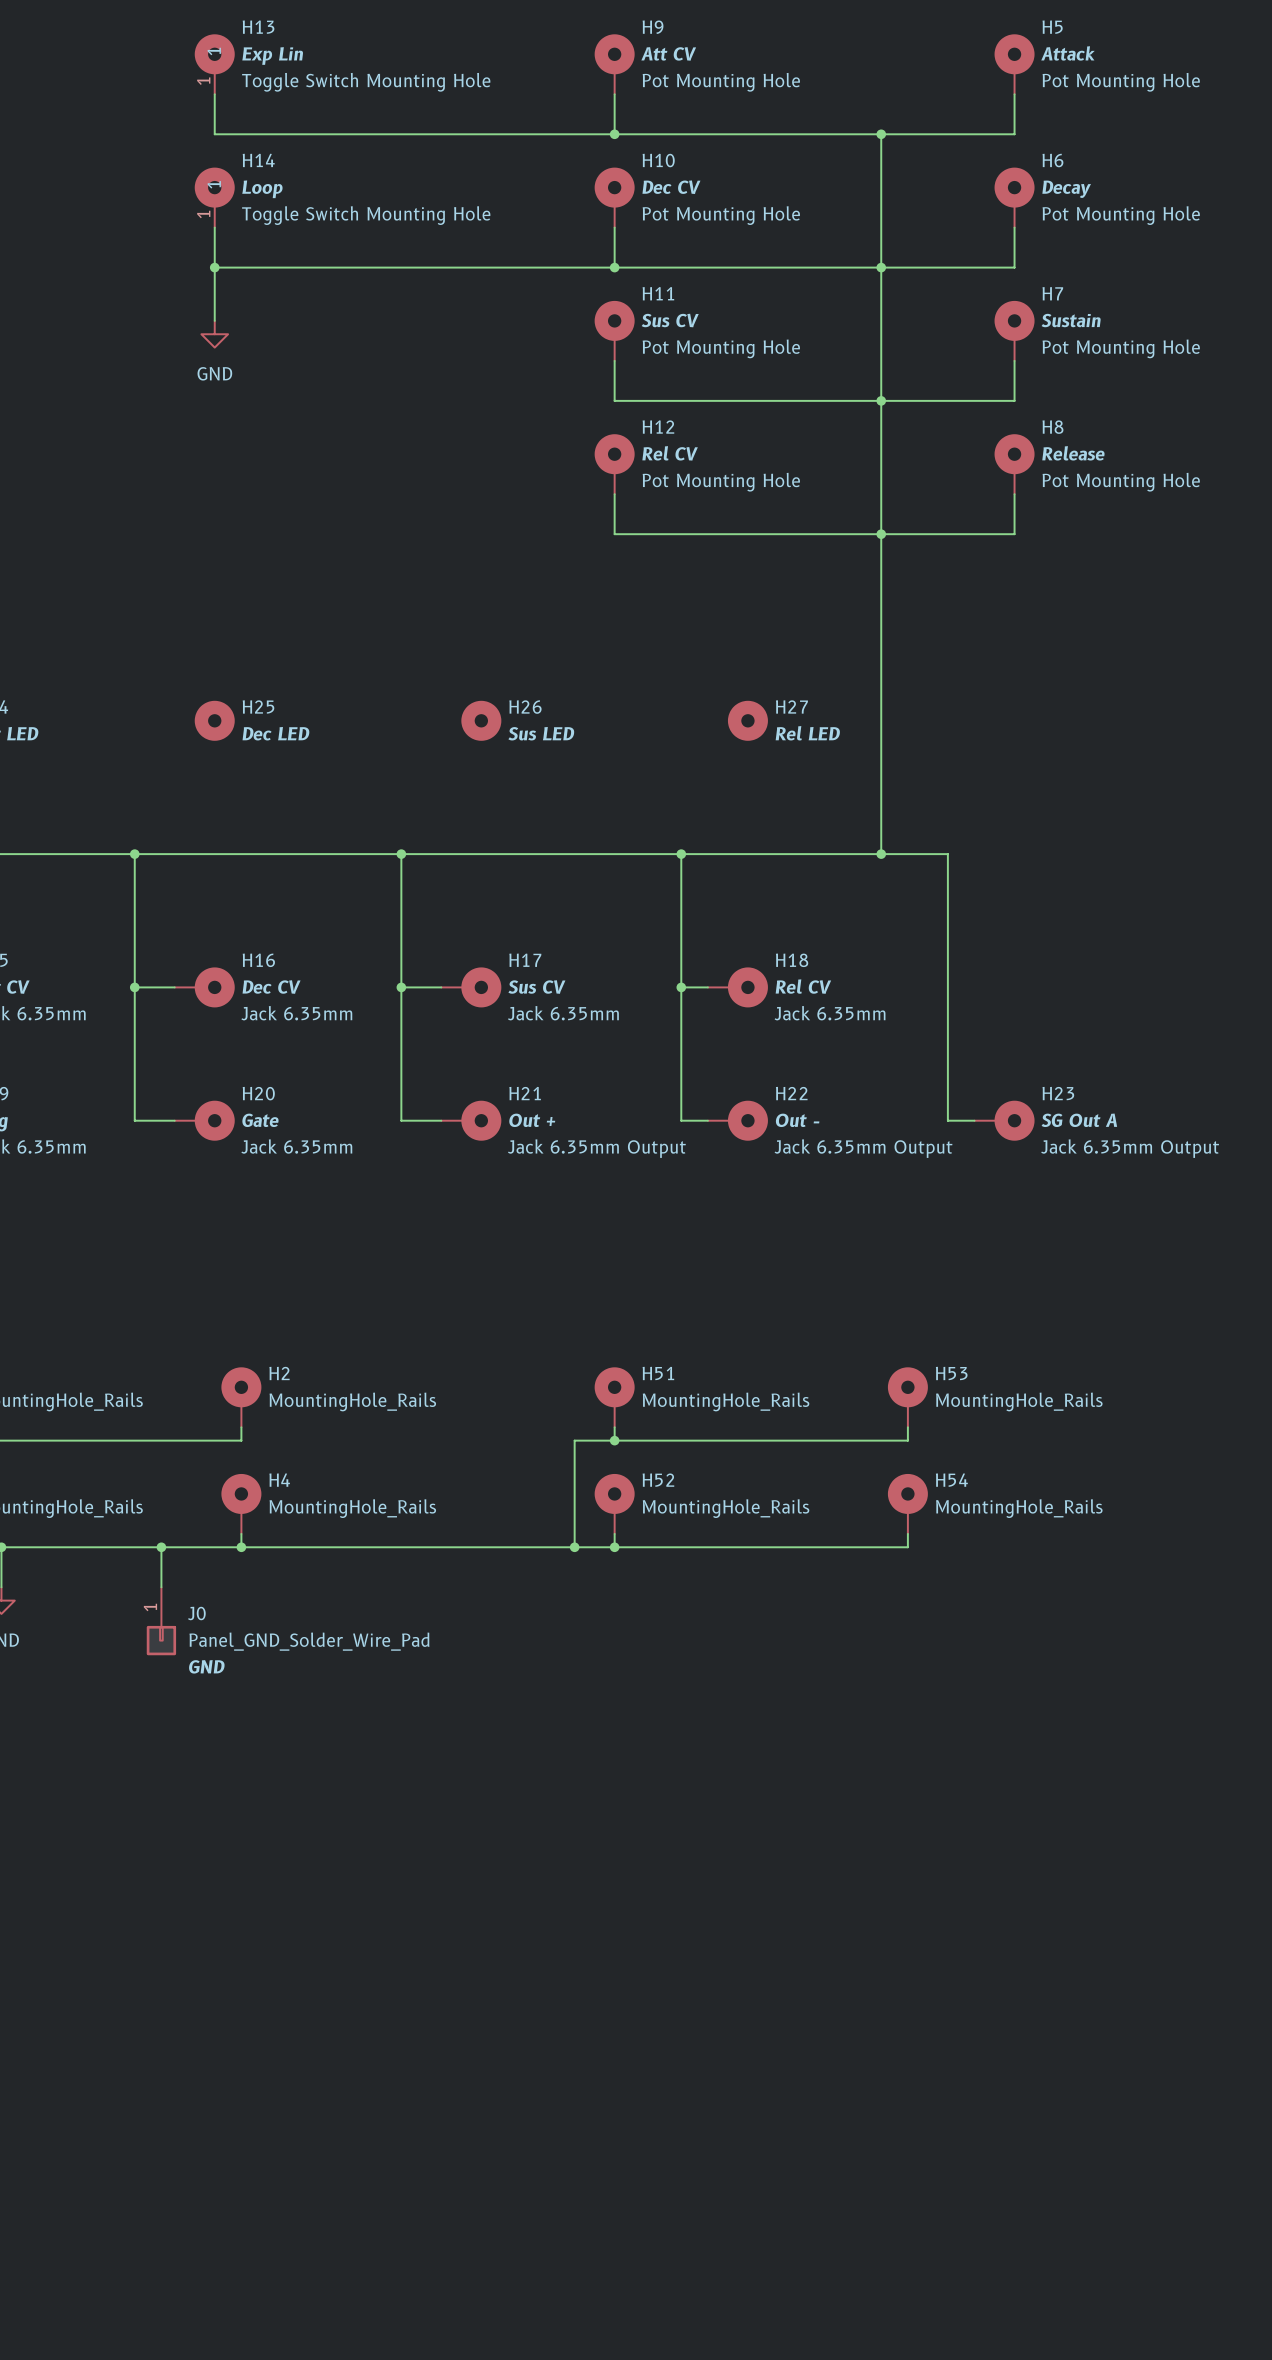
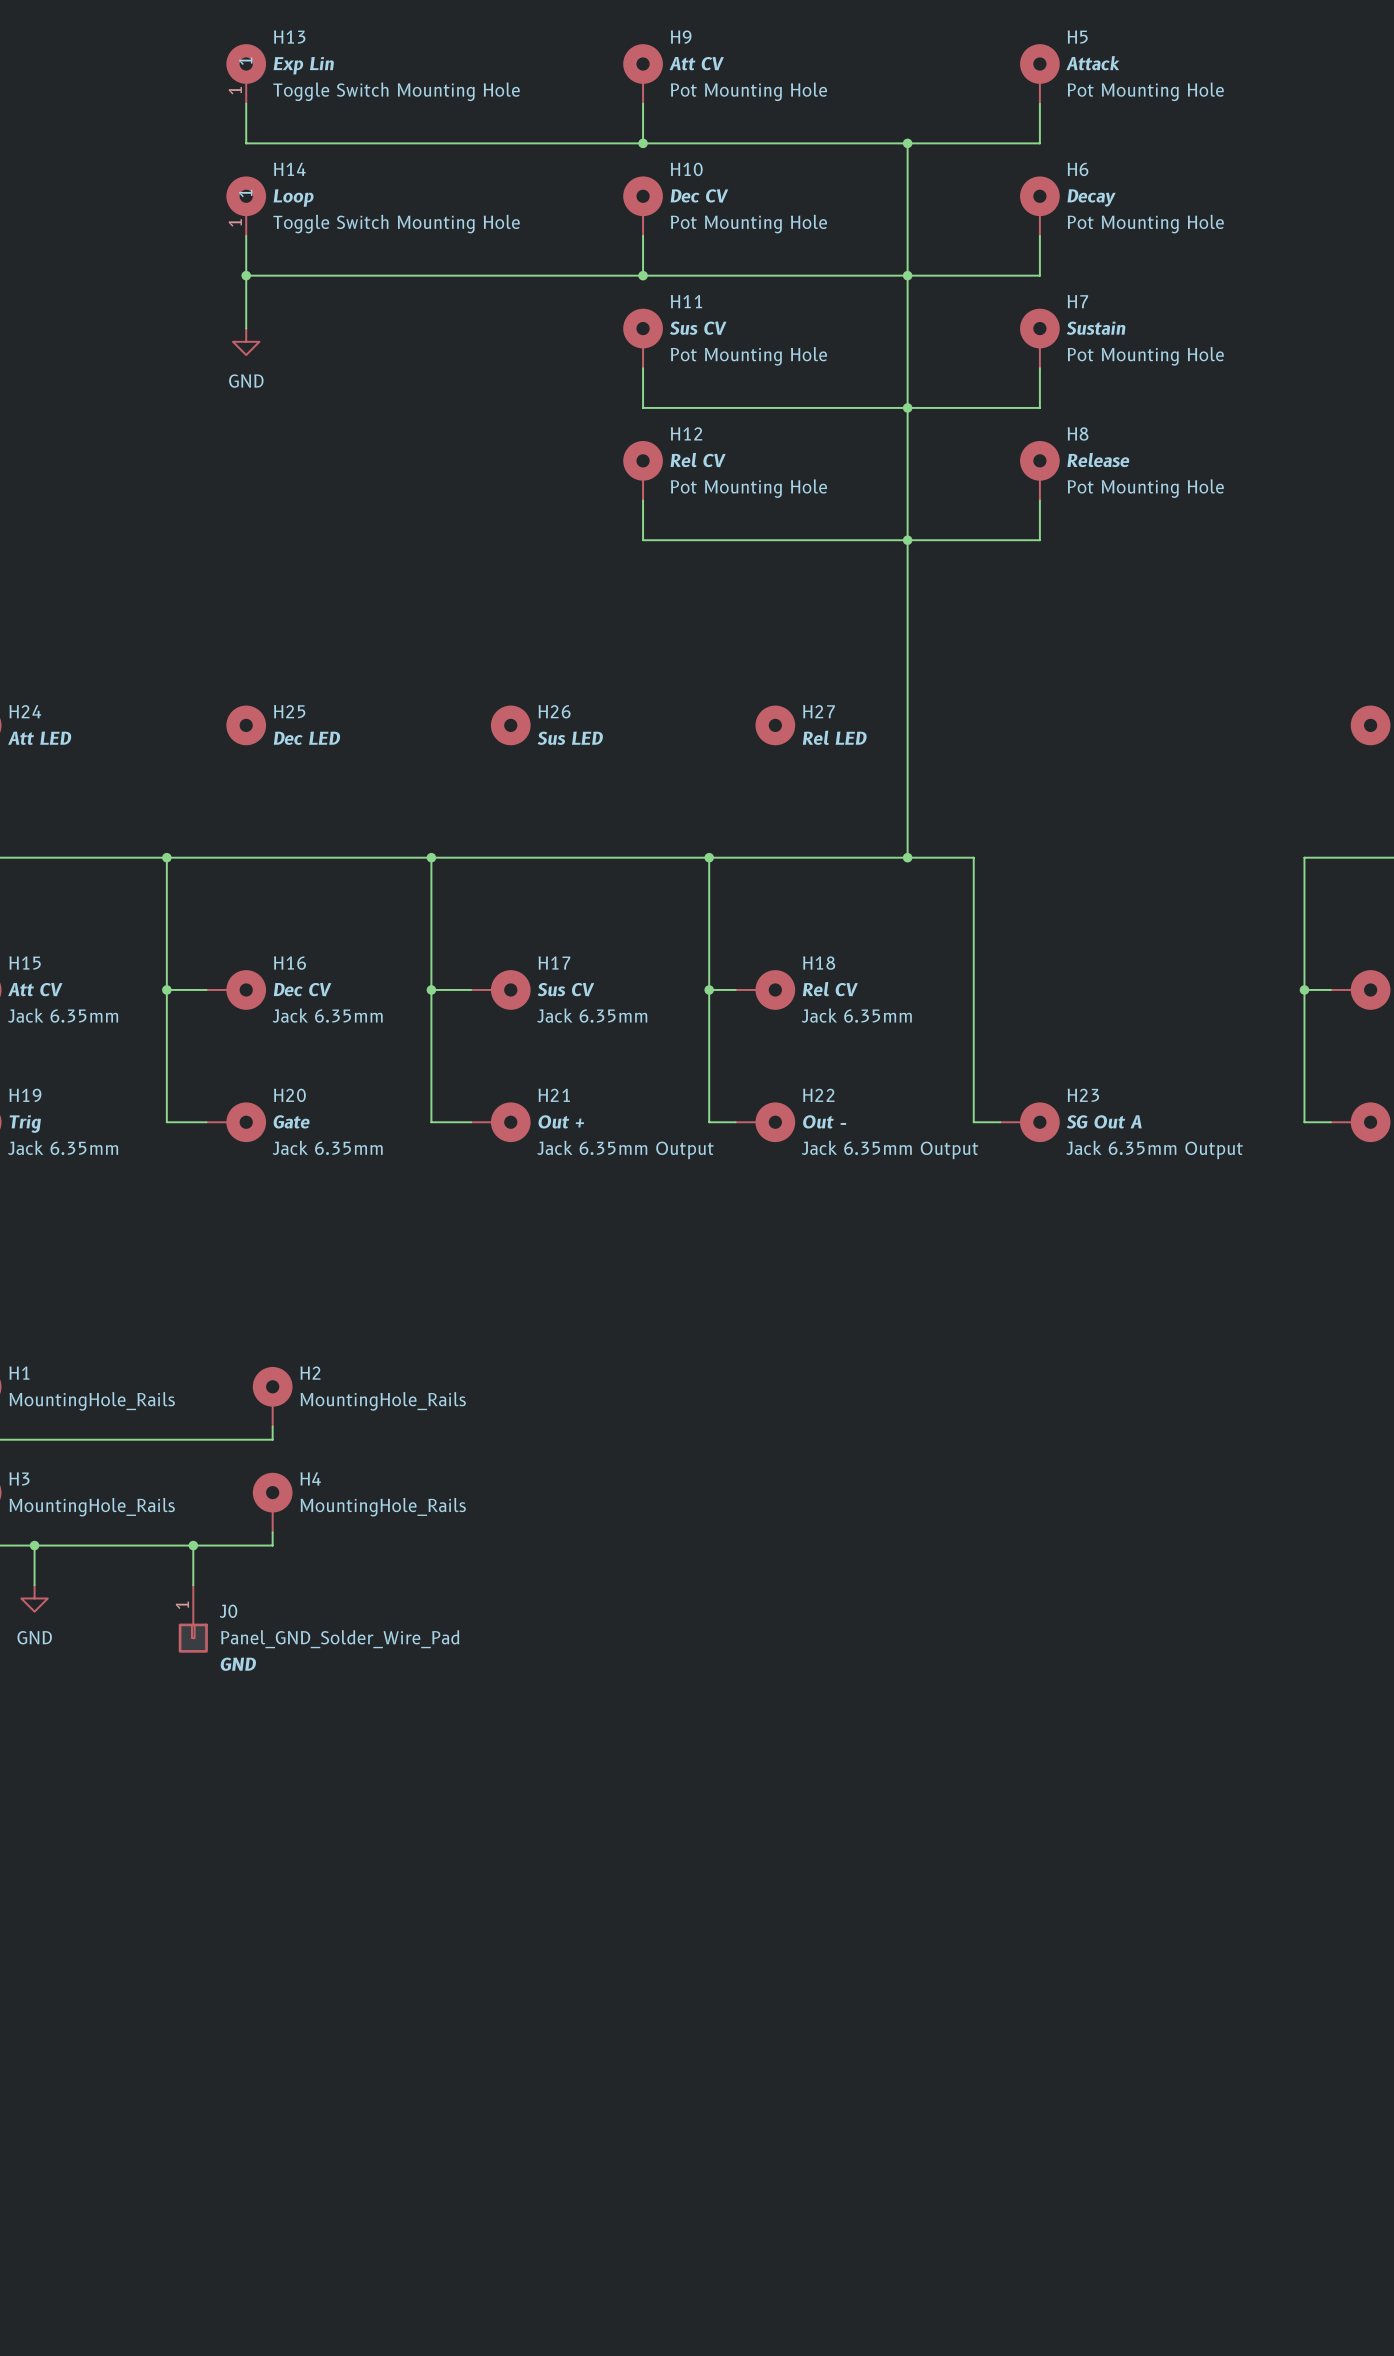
H51: MountingHole_Rails (614, 1397) -> none
H53: MountingHole_Rails (907, 1397) -> none
wire: (614, 1427) (614, 1440) -> none
wire: (907, 1427) (907, 1440) (574, 1440) (574, 1547) -> none
junction: (614, 1440) -> none
H52: MountingHole_Rails (614, 1503) -> none
H54: MountingHole_Rails (907, 1503) -> none
wire: (614, 1533) (614, 1547) -> none
wire: (907, 1533) (907, 1547) (241, 1547) -> none
junction: (241, 1547) -> none
junction: (574, 1547) -> none
junction: (614, 1547) -> none

